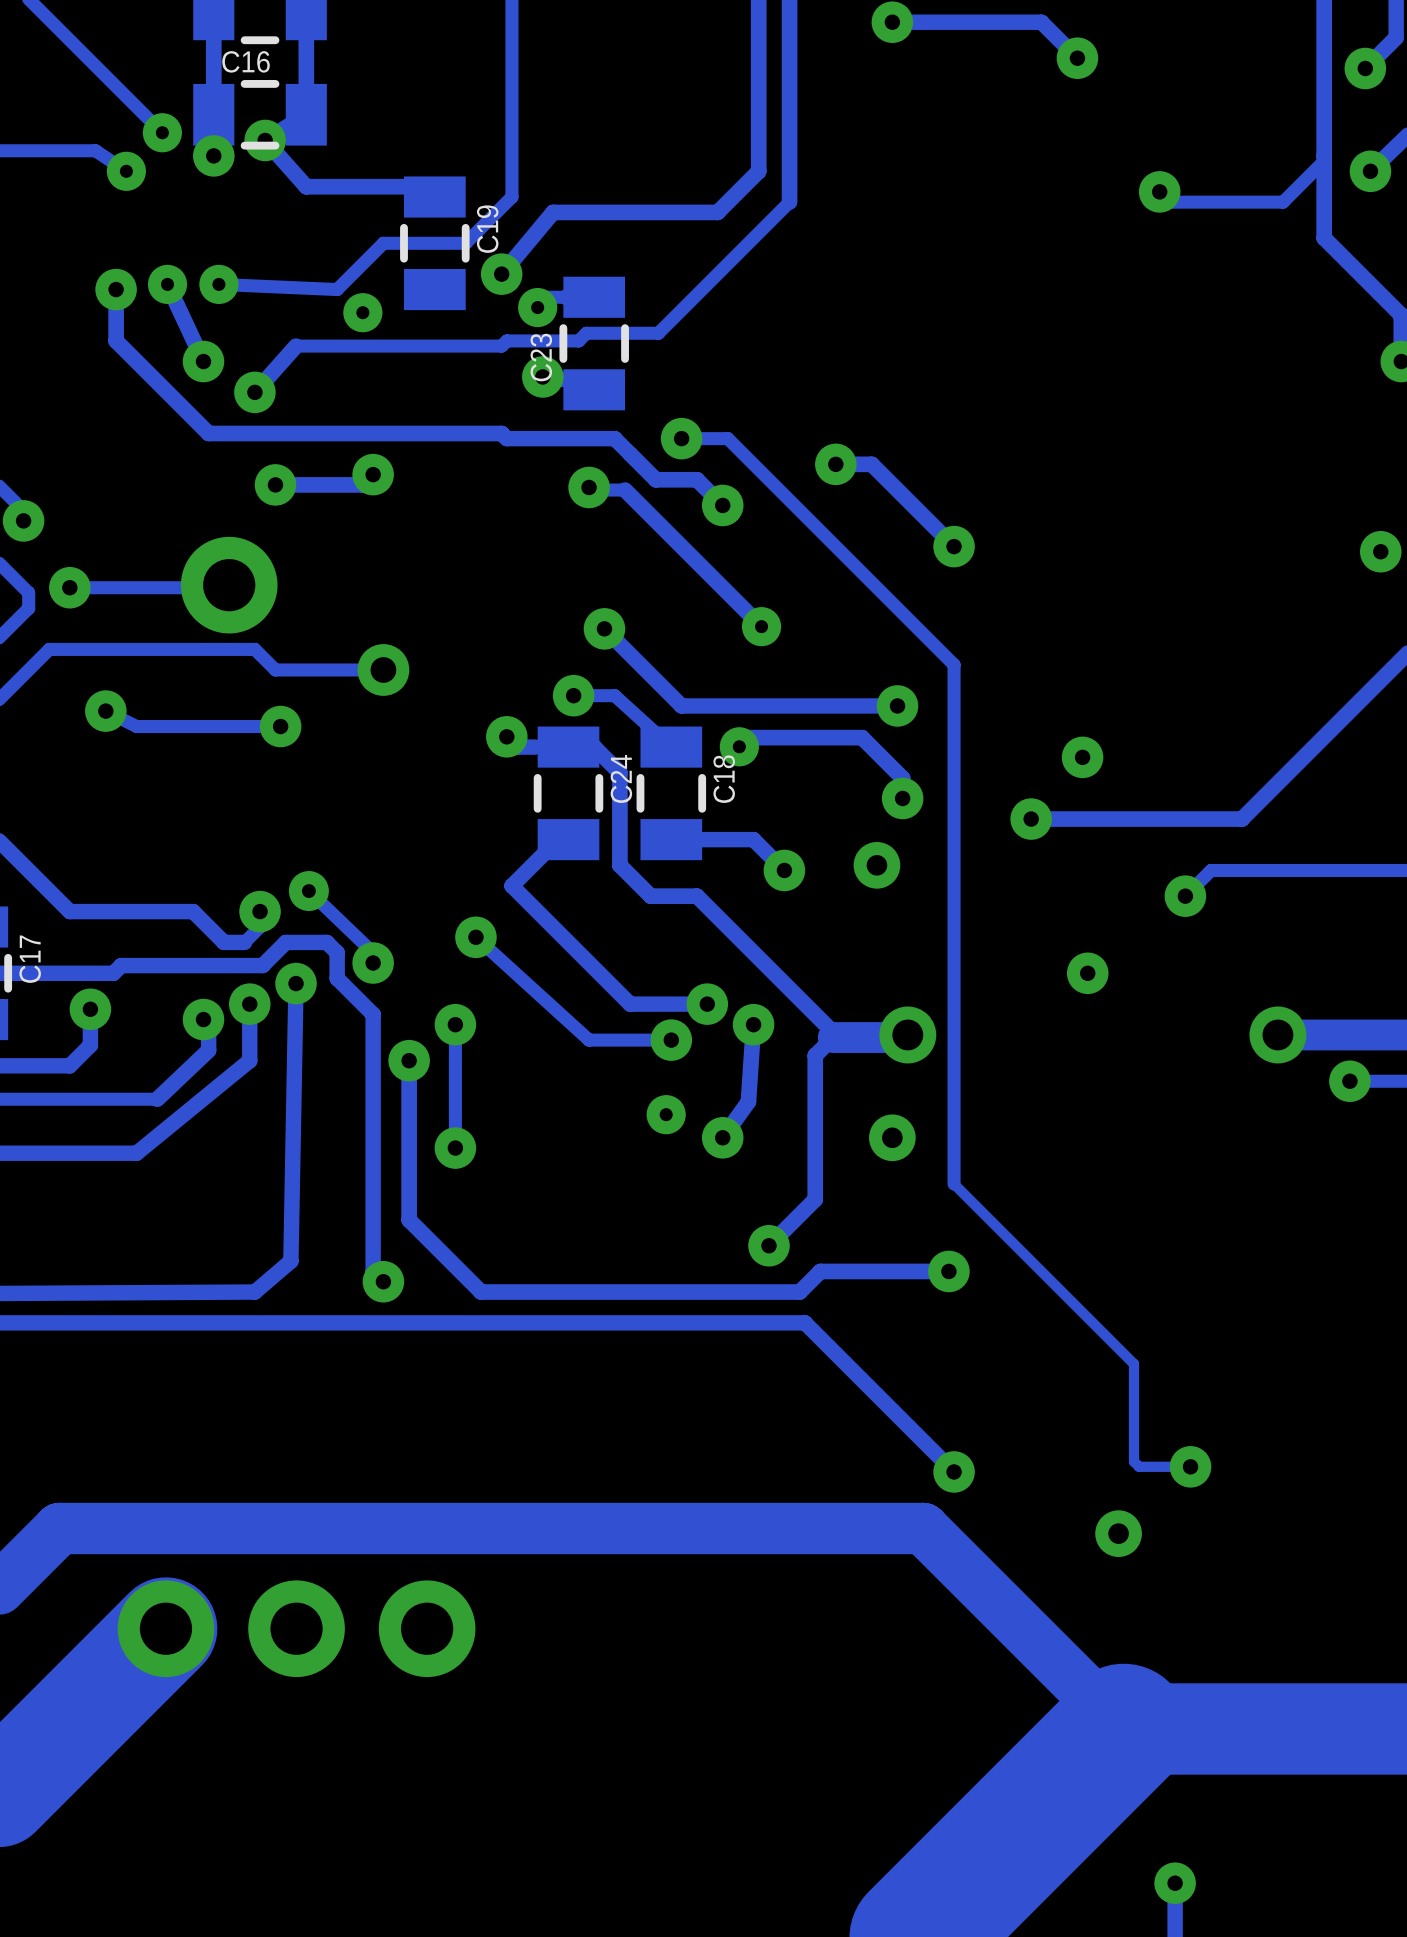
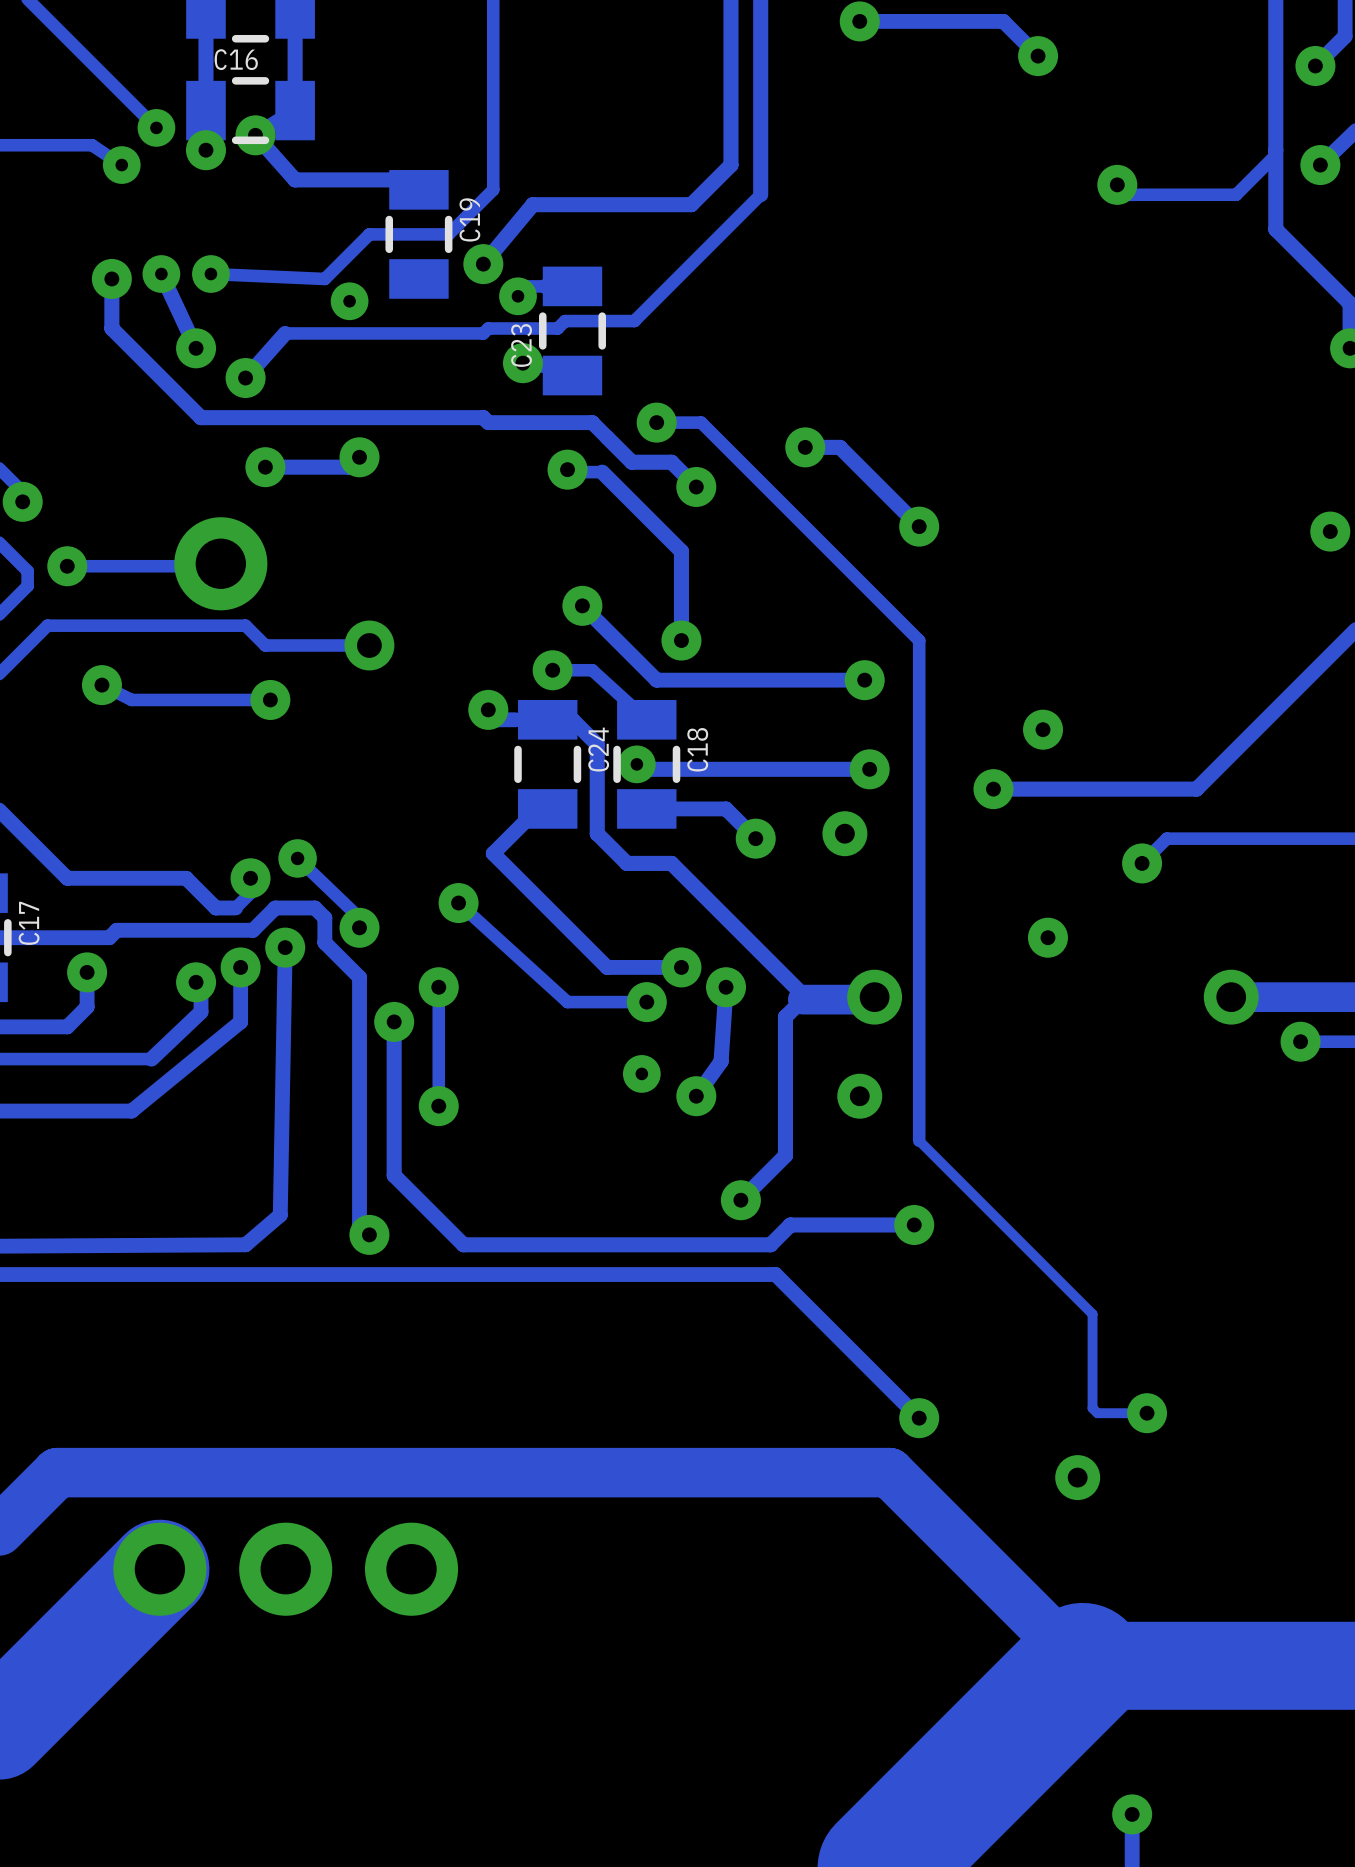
track: (707, 572) (761, 626) -> (681, 551) (681, 640)
via: (761, 626) -> none
via: none -> (681, 640)
track: (739, 746) (748, 737) (862, 737) (902, 778) (902, 798) -> (636, 764) (641, 769) (869, 769)
via position: (739, 746) -> (636, 764)

